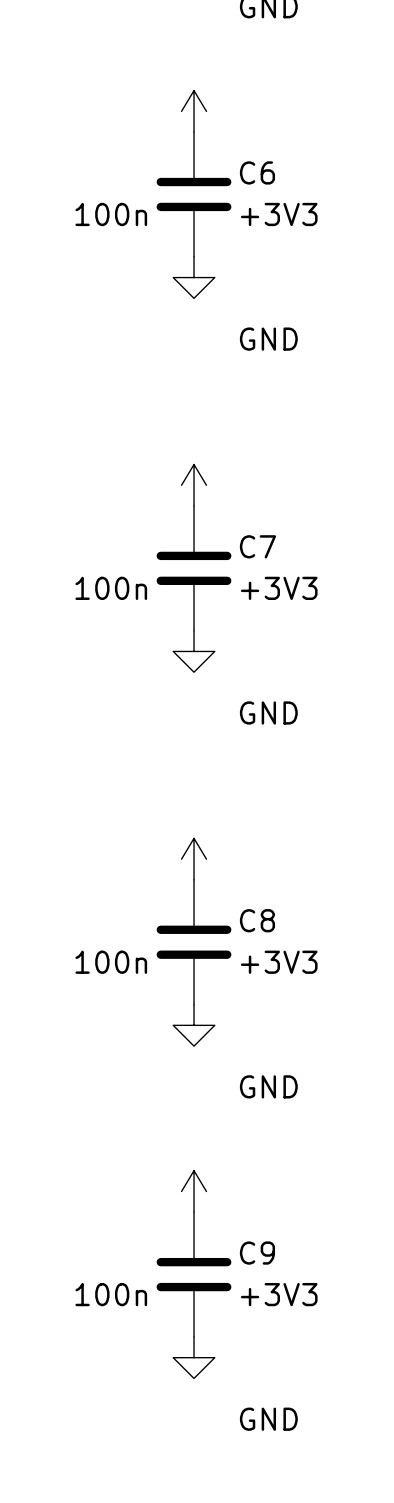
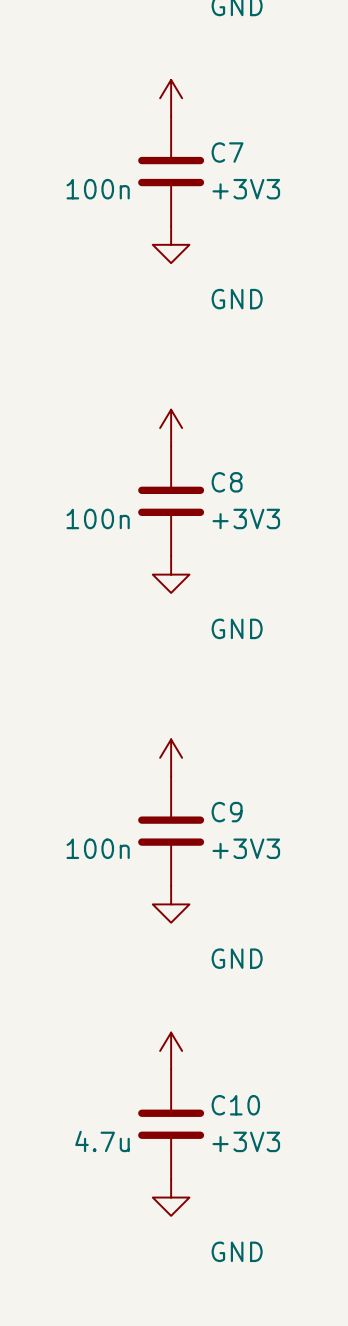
C6 name: C6 (257, 172) -> C7 (227, 152)
C7 name: C7 (257, 546) -> C8 (227, 482)
C8 name: C8 (257, 920) -> C9 (227, 812)
C9 name: C9 (257, 1253) -> C10 (235, 1105)
C9 value: 100n (111, 1294) -> 4.7u (102, 1141)

